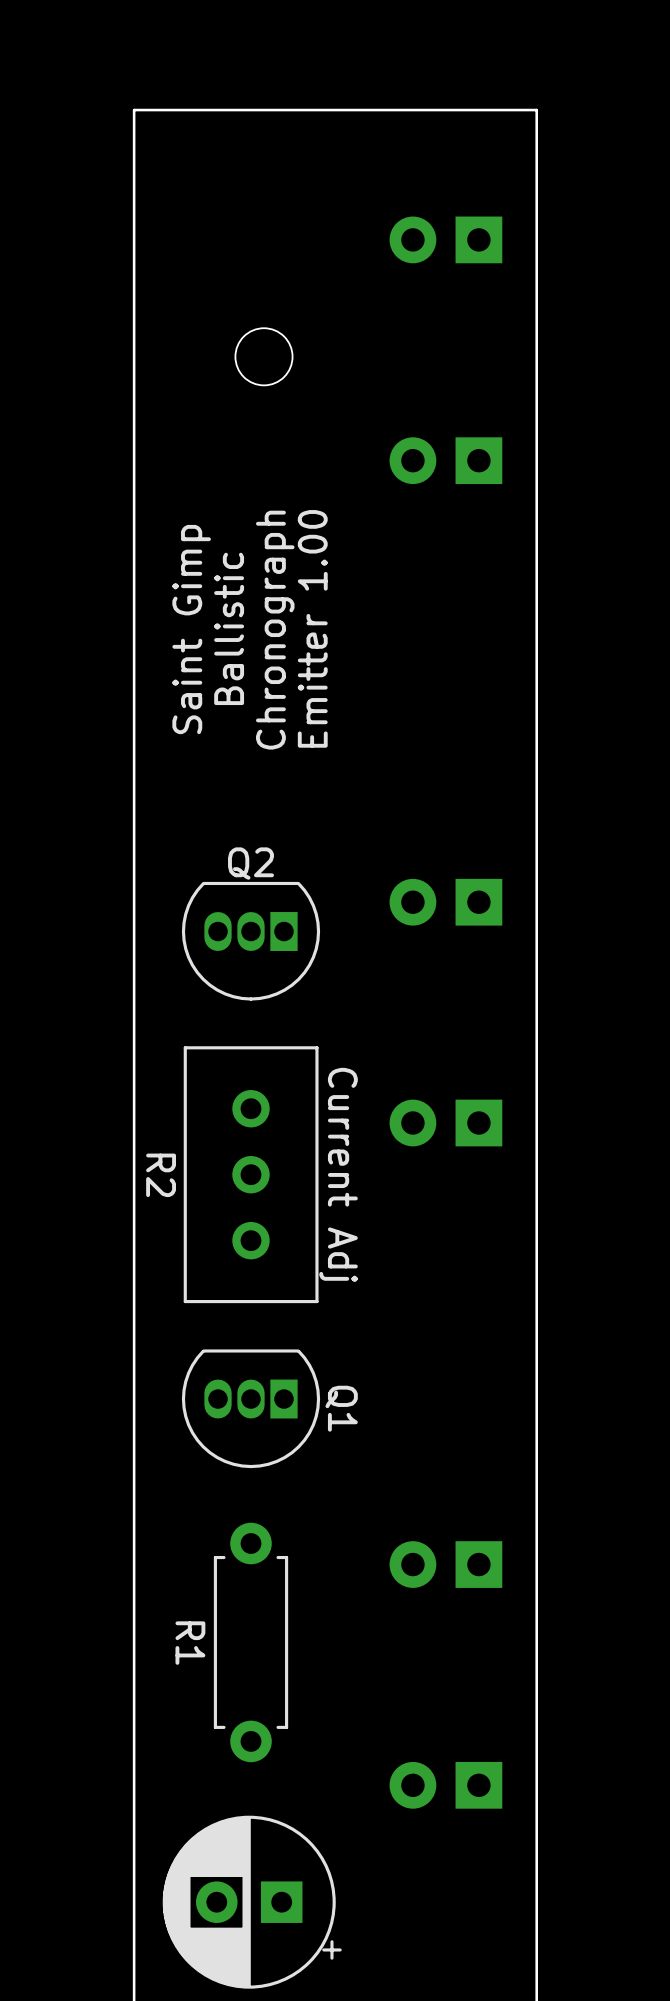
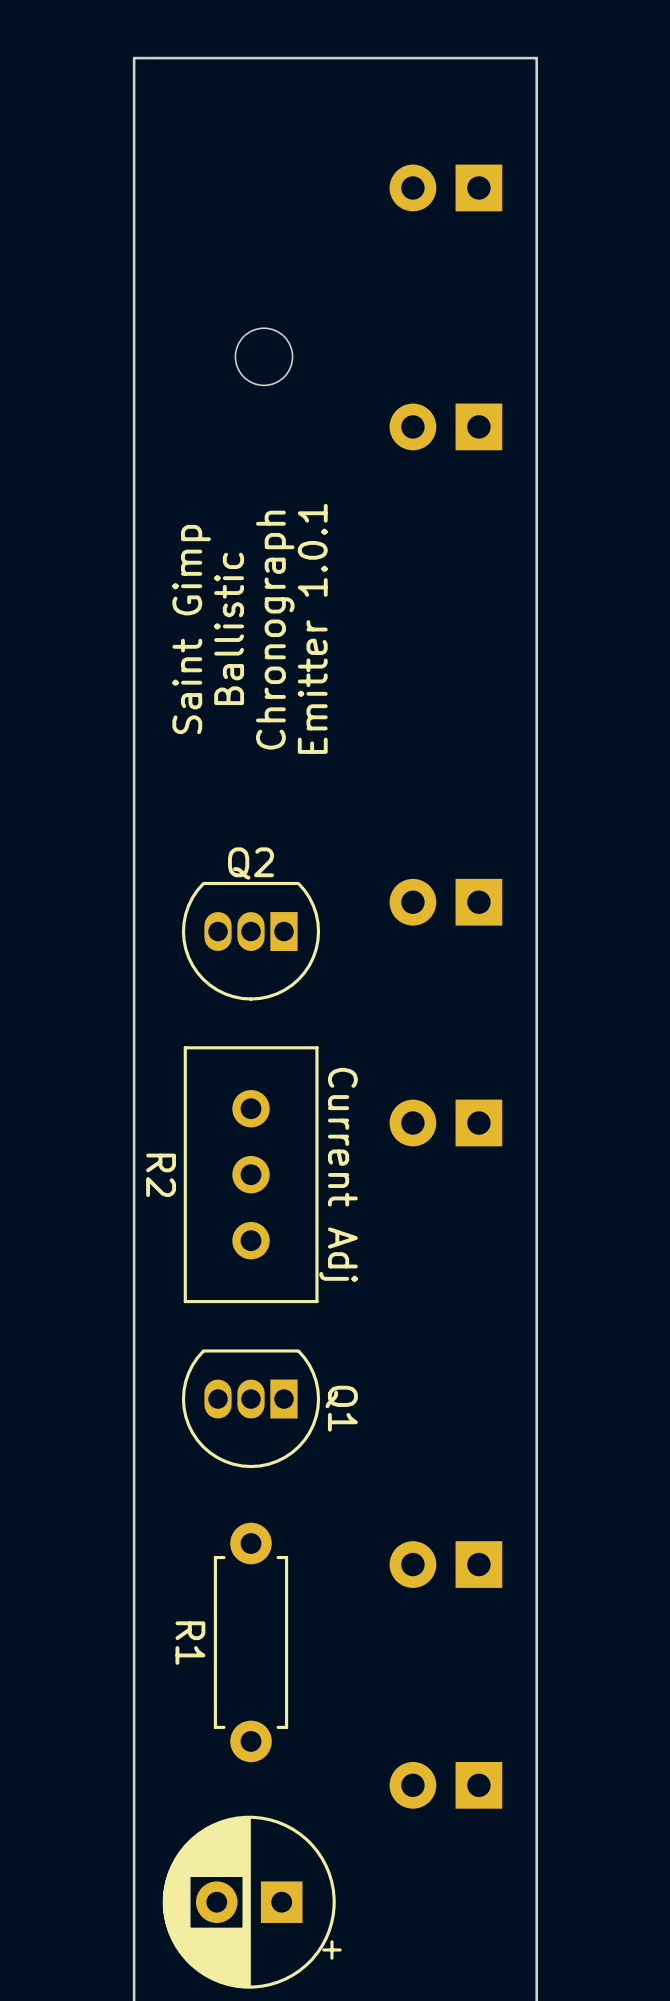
board edge: (536, 110) (134, 110) -> (536, 110) (536, 58) (134, 58) (134, 110)
part position: (445, 239) -> (445, 187)
part position: (445, 460) -> (445, 426)
text: Emitter 1.00 (312, 628) -> Emitter 1.0.1 (312, 628)

